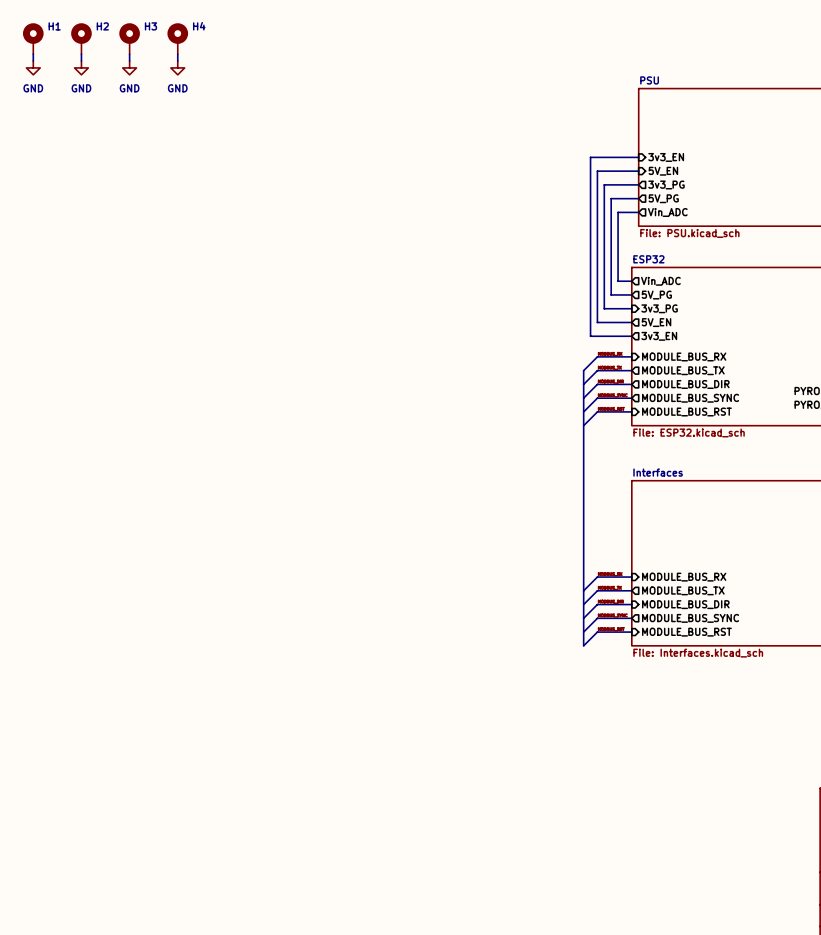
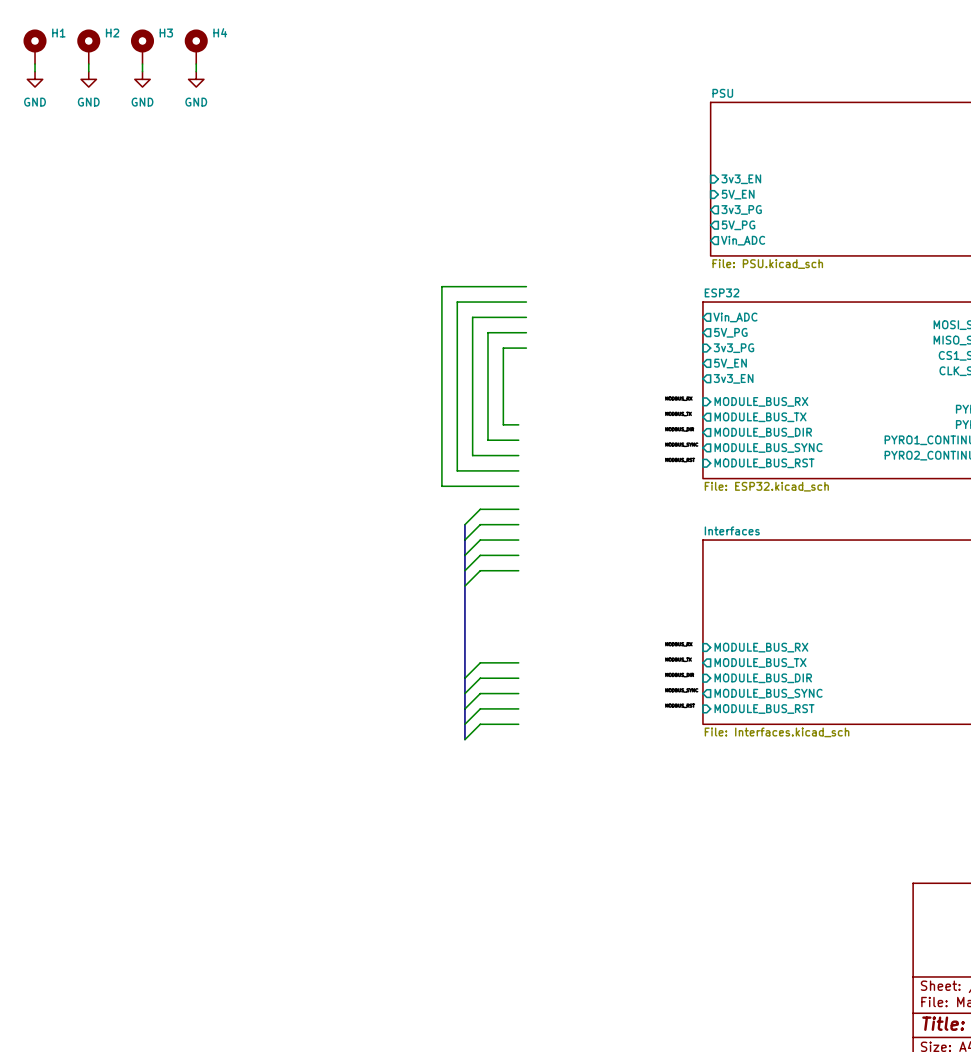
wire: (638, 157) (590, 157) (590, 336) (631, 336) -> none
wire: (638, 171) (597, 171) (597, 322) (631, 322) -> none
wire: (638, 184) (604, 184) (604, 308) (631, 308) -> none
wire: (638, 198) (611, 198) (611, 294) (631, 294) -> none
wire: (638, 212) (618, 212) (618, 281) (631, 281) -> none
wire: none -> (526, 286) (441, 286) (441, 486) (518, 486)
wire: none -> (526, 302) (457, 302) (457, 470) (518, 470)
wire: none -> (526, 317) (472, 317) (472, 455) (518, 455)
wire: none -> (526, 332) (487, 332) (487, 440) (518, 440)
wire: none -> (526, 348) (503, 348) (503, 424) (518, 424)
wire: (631, 356) (597, 356) (583, 370) -> none
bus: (583, 370) (583, 645) -> none
wire: (631, 370) (597, 370) (583, 384) -> none
wire: (631, 384) (597, 384) (583, 398) -> none
wire: (631, 398) (597, 398) (583, 411) -> none
wire: (631, 411) (597, 411) (583, 425) -> none
wire: none -> (518, 509) (480, 509) (464, 524)
bus: none -> (464, 524) (464, 739)
wire: none -> (518, 524) (480, 524) (464, 540)
wire: none -> (518, 540) (480, 540) (464, 555)
wire: none -> (518, 555) (480, 555) (464, 570)
wire: none -> (518, 570) (480, 570) (464, 586)
wire: (631, 577) (597, 577) (583, 590) -> none
wire: none -> (518, 662) (480, 662) (464, 678)
wire: (631, 590) (597, 590) (583, 604) -> none
wire: none -> (518, 678) (480, 678) (464, 693)
wire: (631, 604) (597, 604) (583, 618) -> none
wire: none -> (518, 693) (480, 693) (464, 708)
wire: (631, 618) (597, 618) (583, 632) -> none
wire: none -> (518, 708) (480, 708) (464, 724)
wire: (631, 632) (597, 632) (583, 645) -> none
wire: none -> (518, 724) (480, 724) (464, 739)

